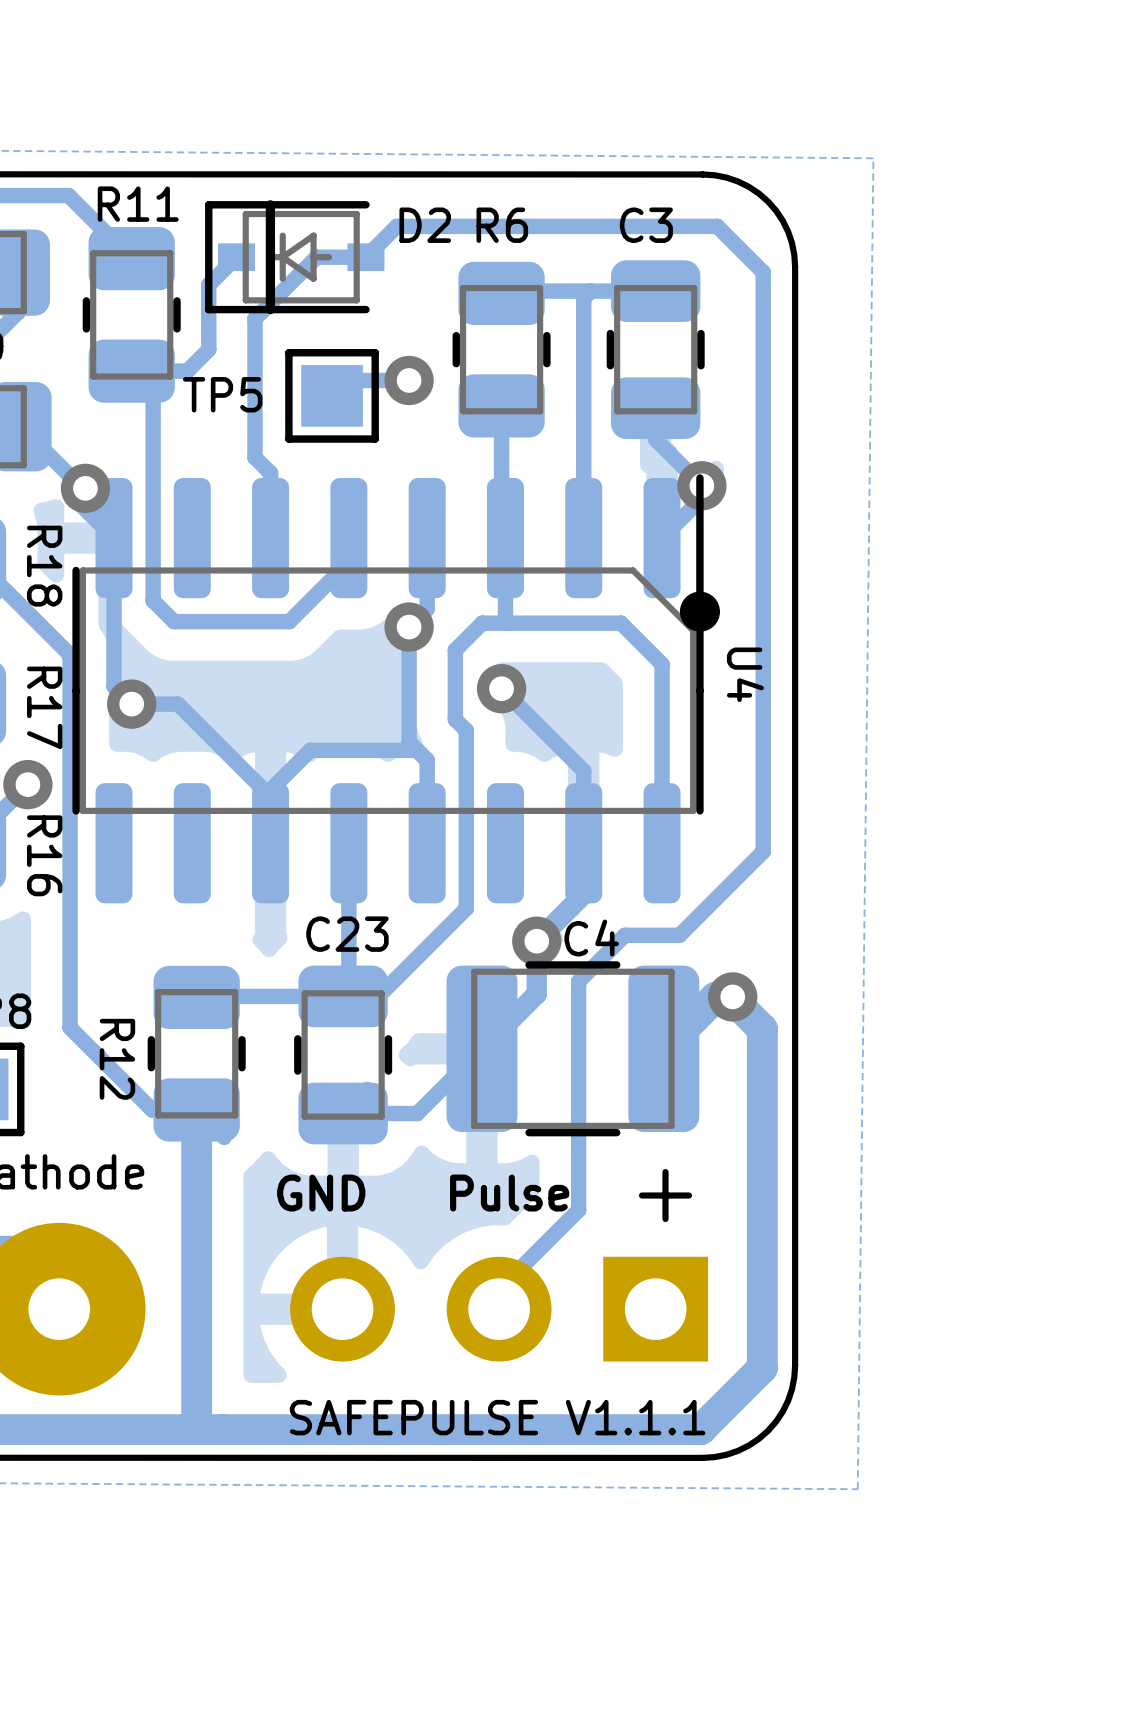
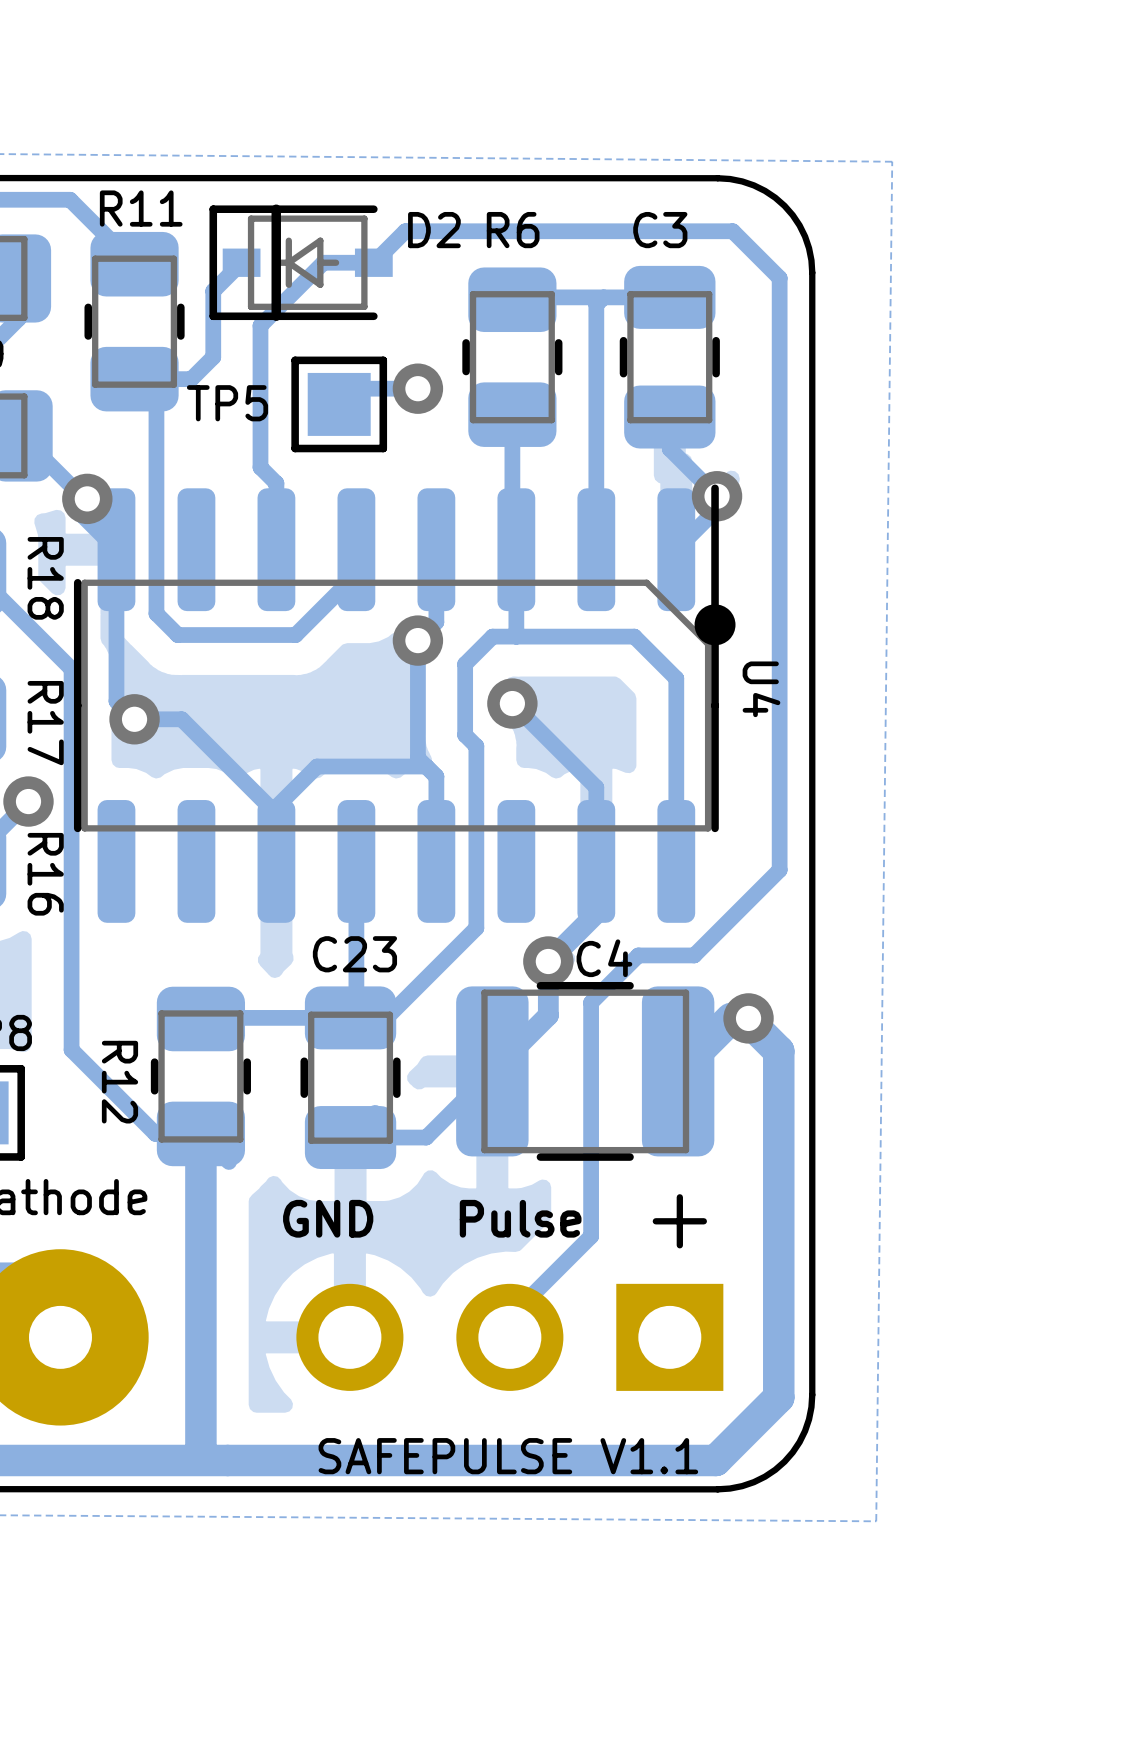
text: SAFEPULSE V1.1.1 (497, 1417) -> SAFEPULSE V1.1 (508, 1456)

